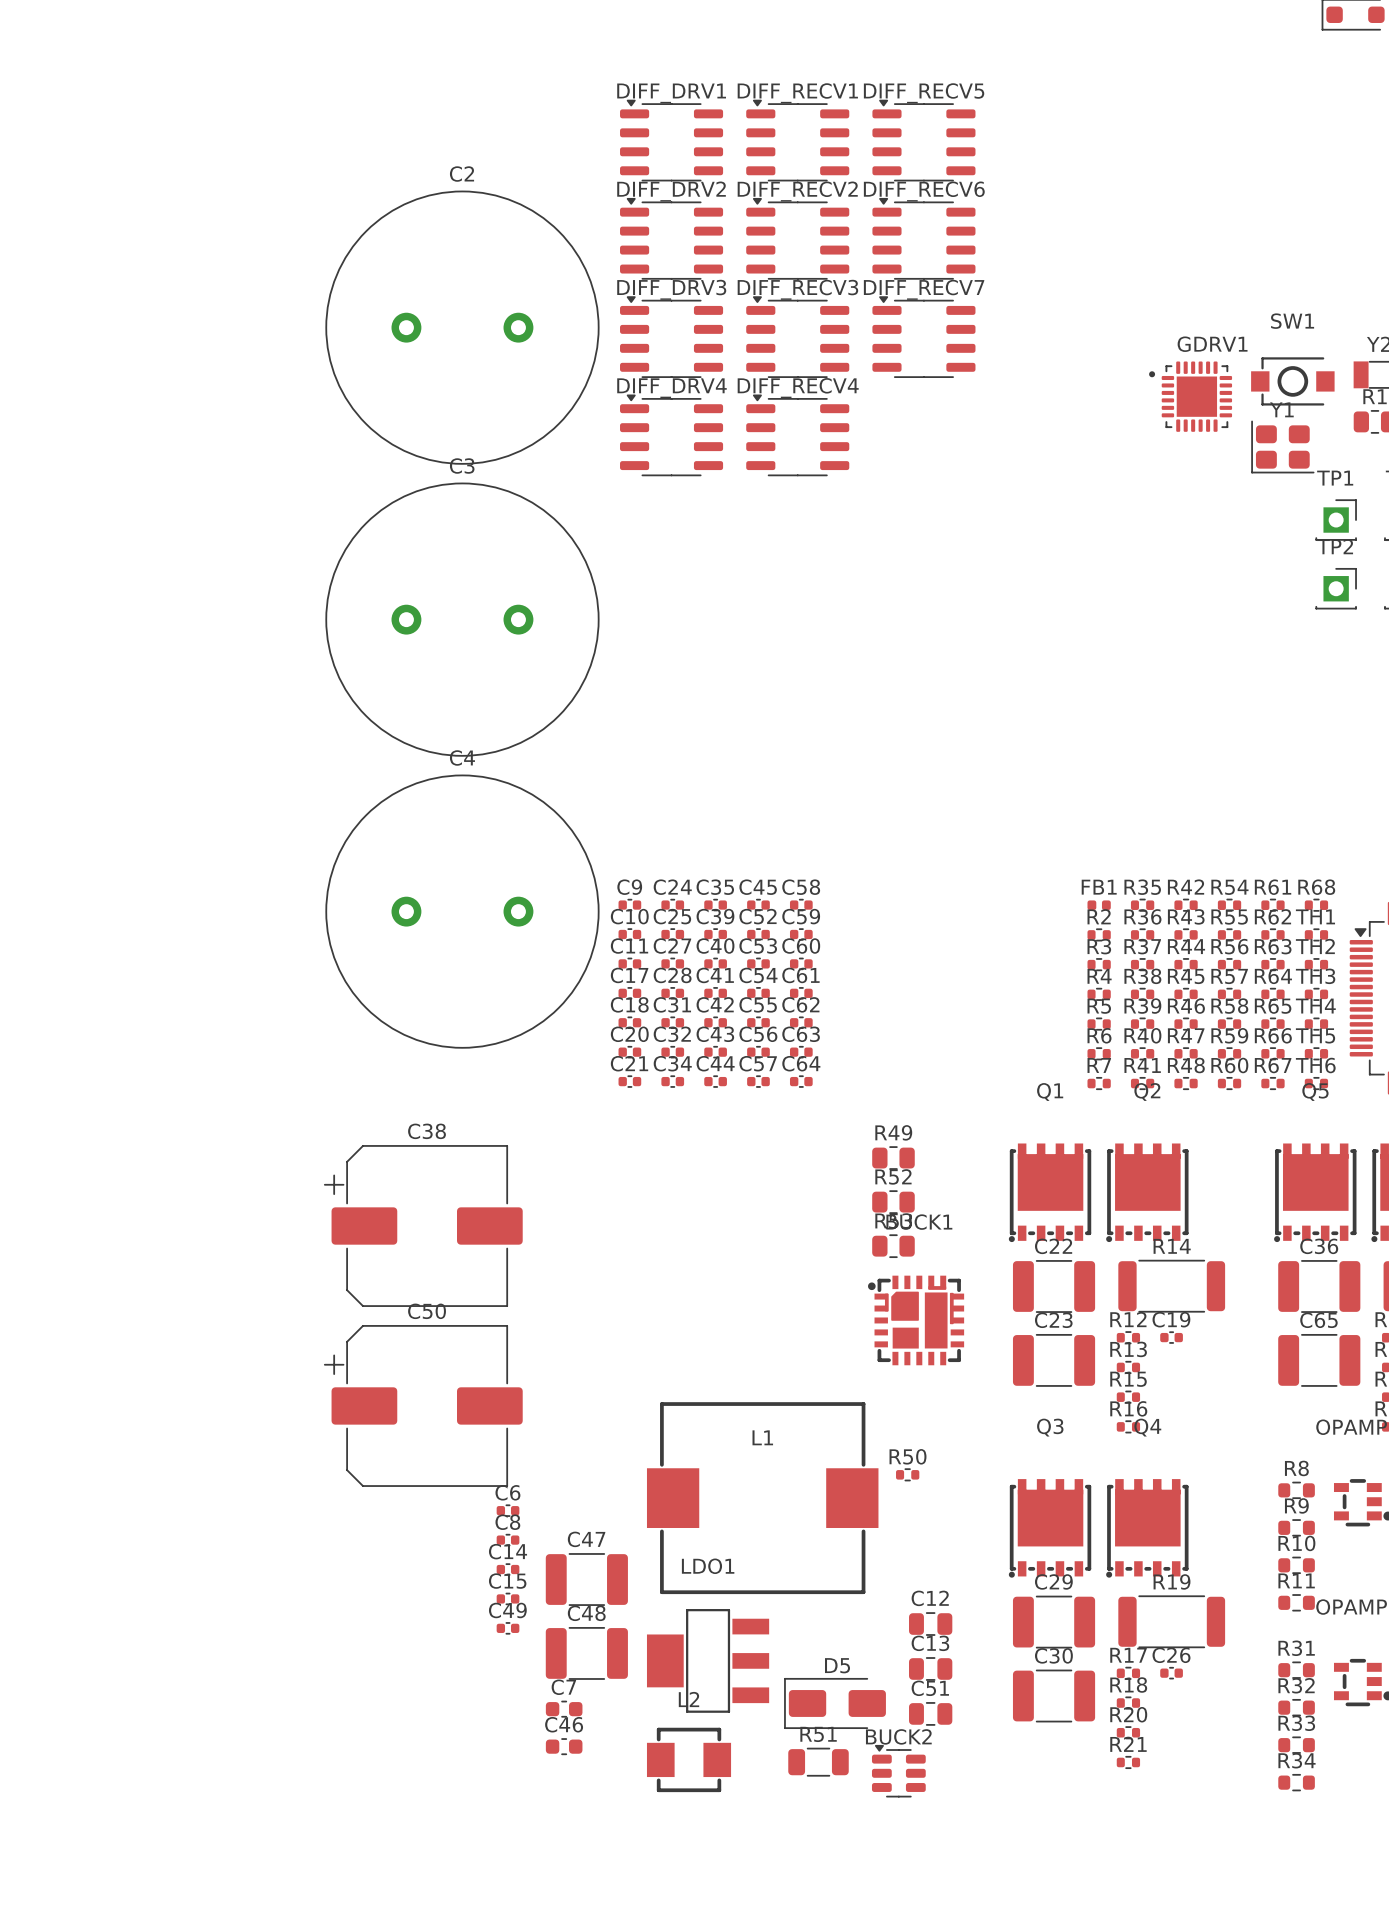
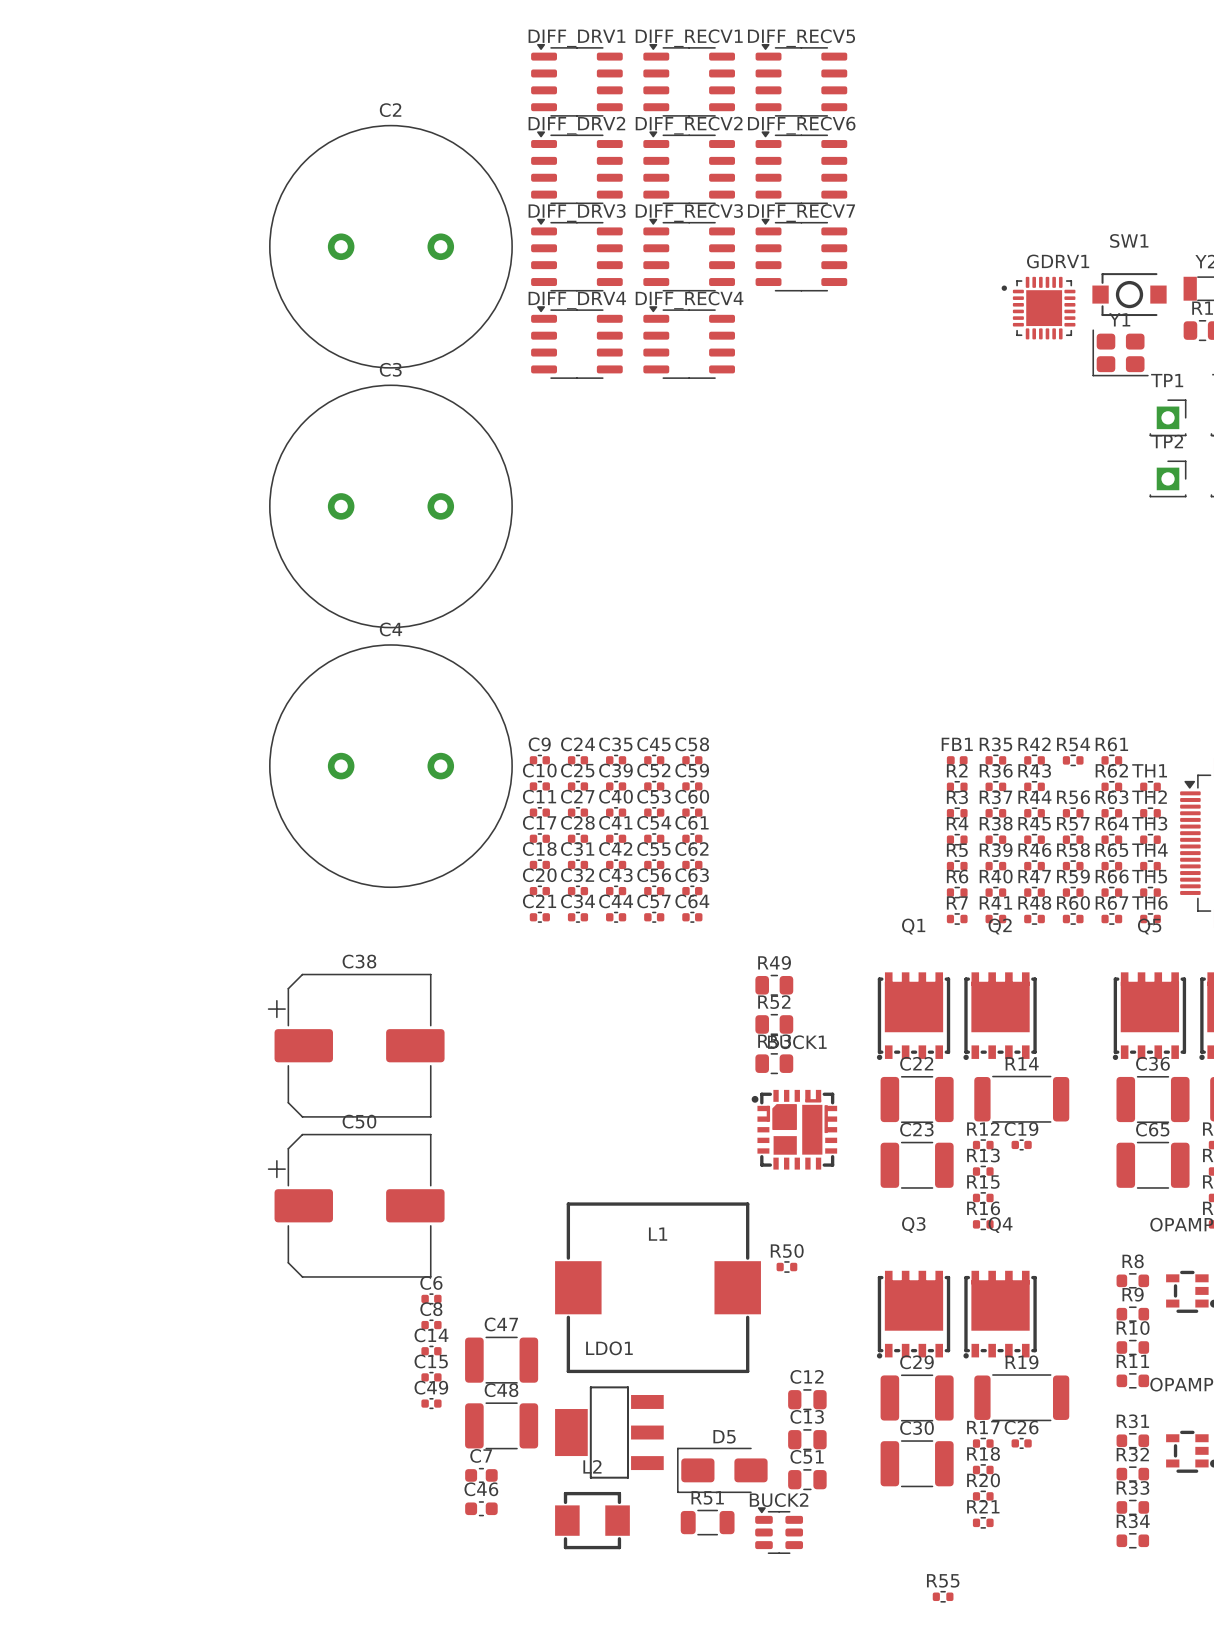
R68: (1316, 905) -> none
R55 position: (1229, 934) -> (943, 1596)

